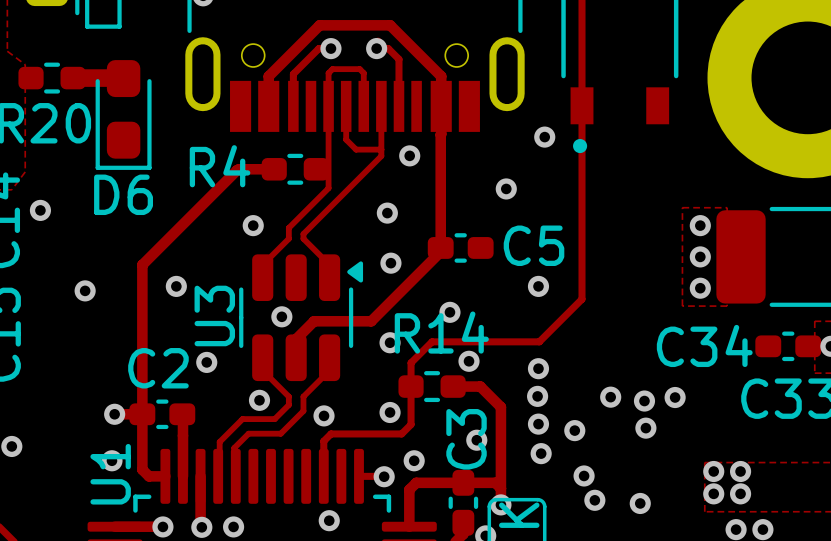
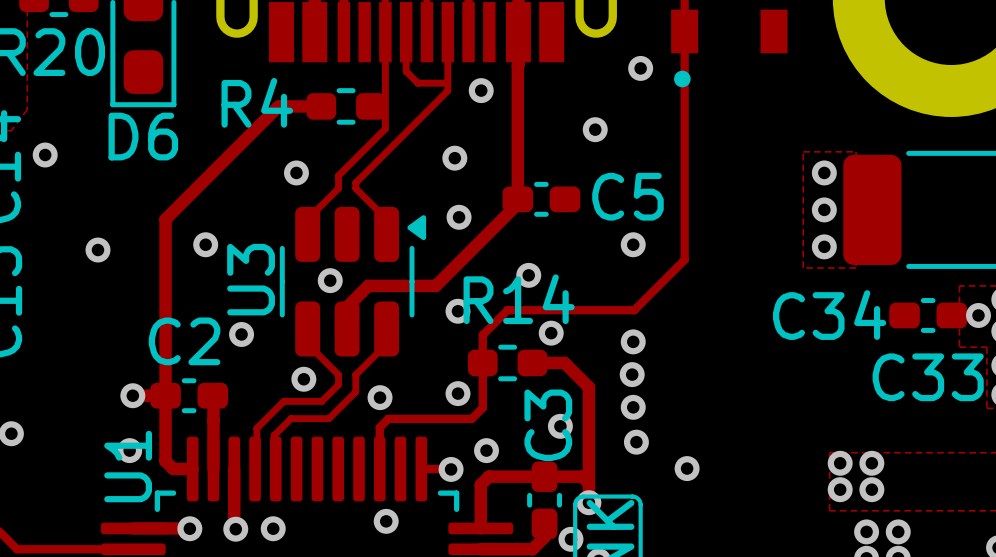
via: (610, 397) -> none
via: (675, 397) -> none
via: (644, 401) -> none
via: (645, 428) -> none
via: (574, 430) -> none
via: (594, 500) -> none
via: (640, 503) -> none

